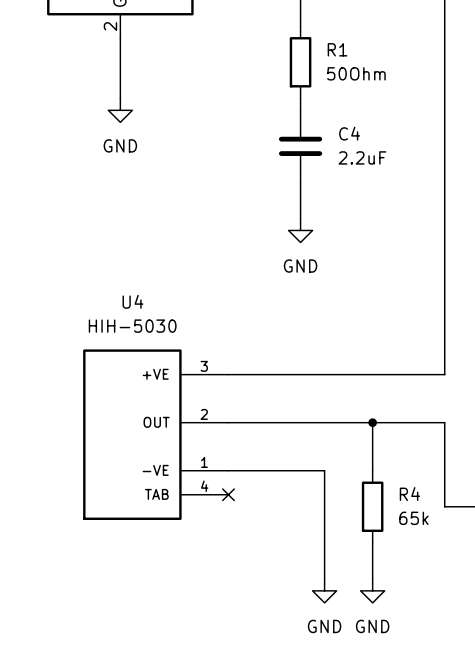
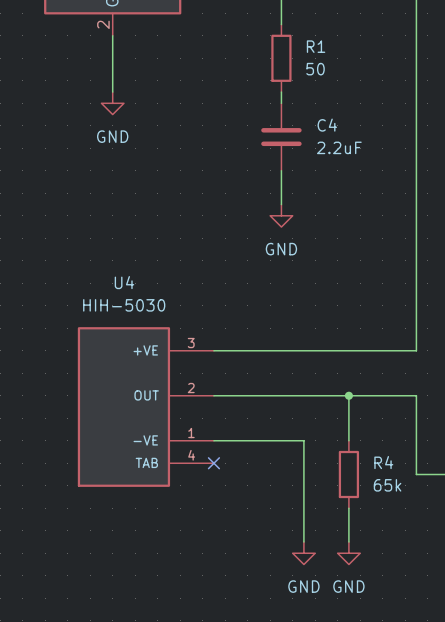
R1 value: 50Ohm (356, 73) -> 50 (315, 69)

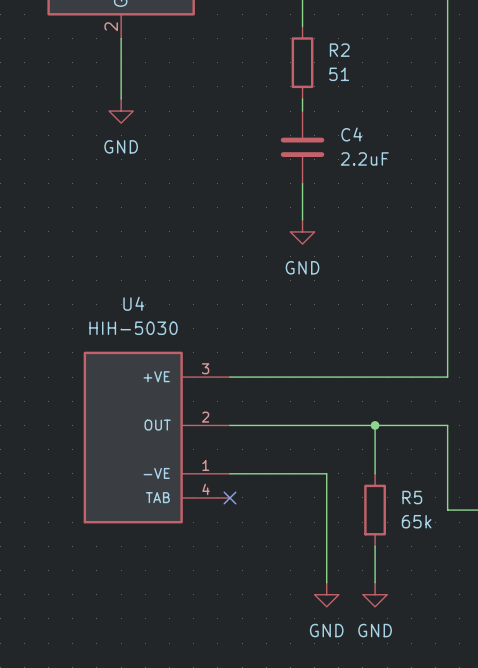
R1 name: R1 (316, 46) -> R2 (339, 50)
R1 value: 50 (315, 69) -> 51 (339, 74)
R4 name: R4 (383, 462) -> R5 (412, 497)

